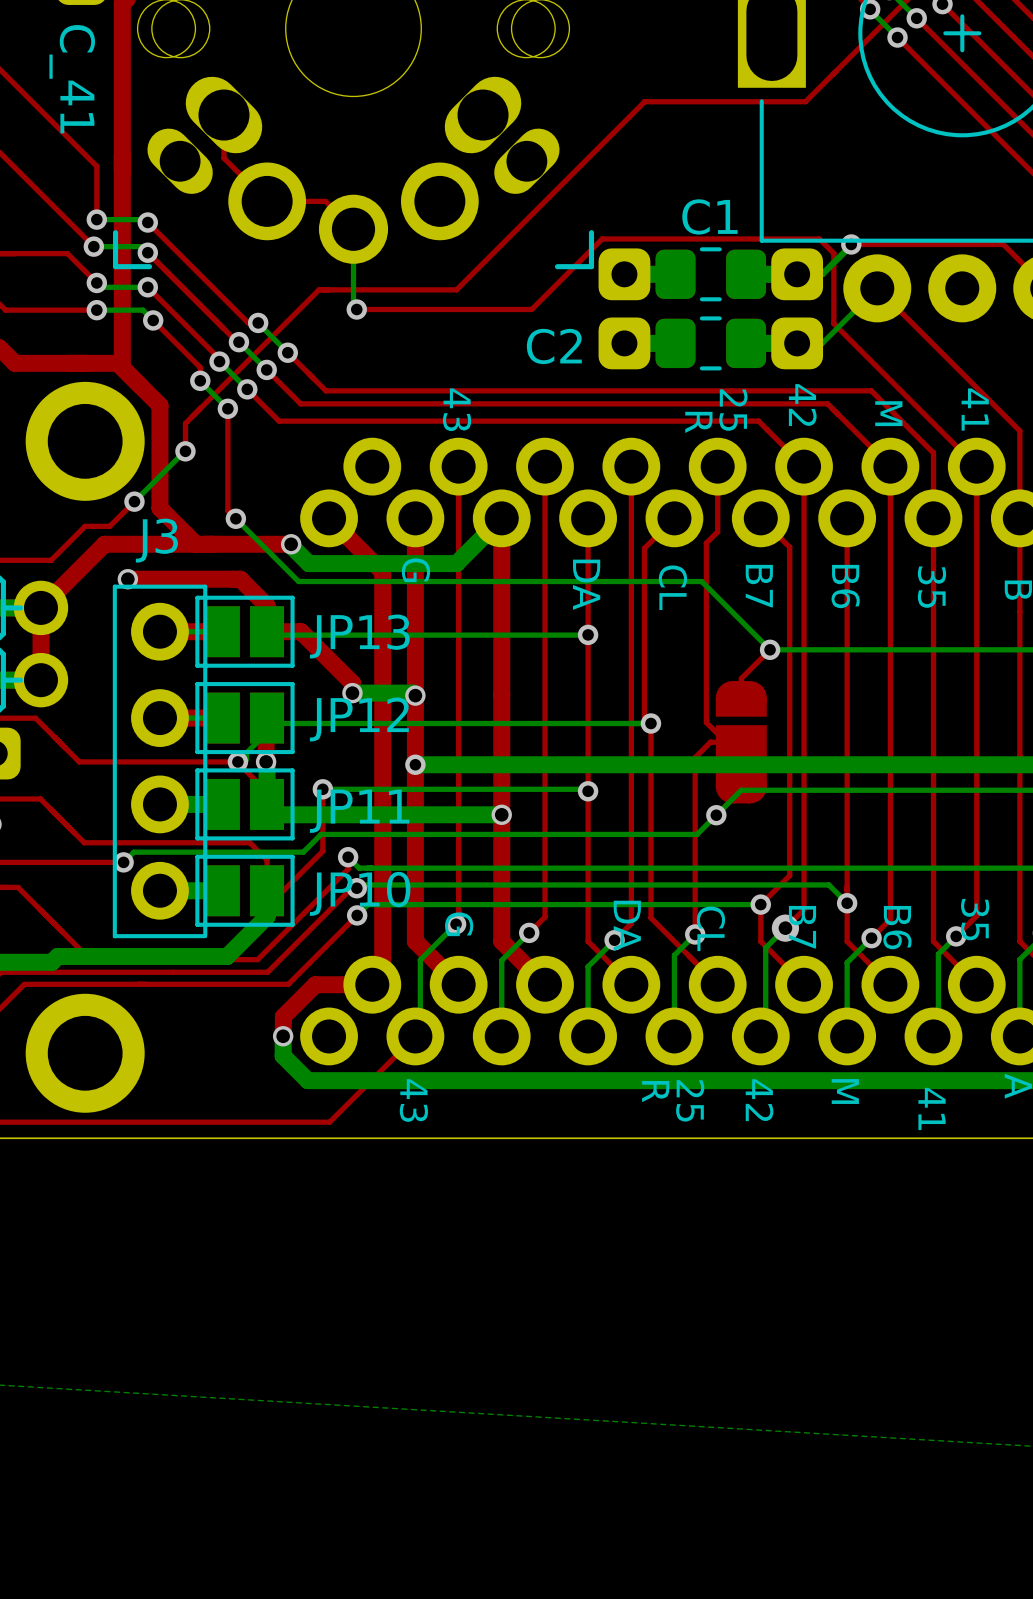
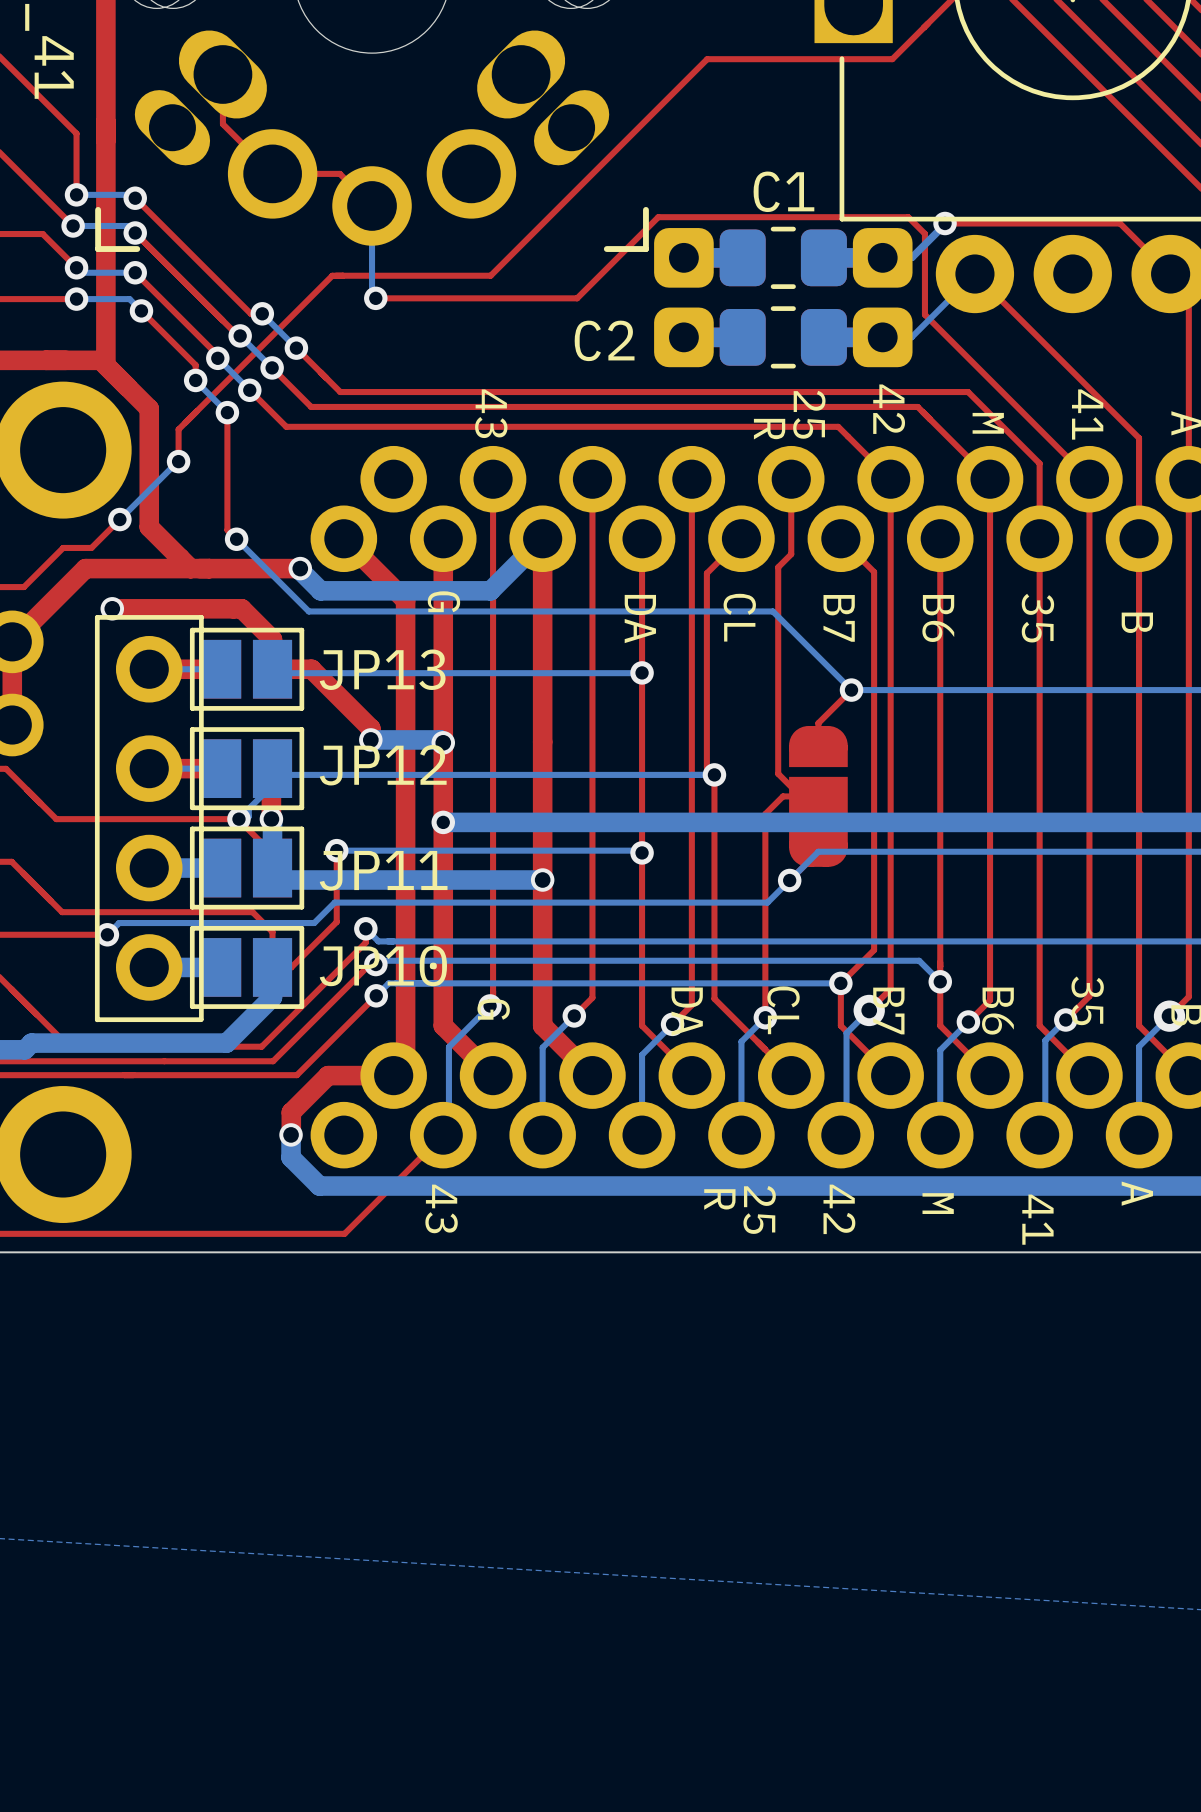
J3 name: J3 (156, 540) -> none

